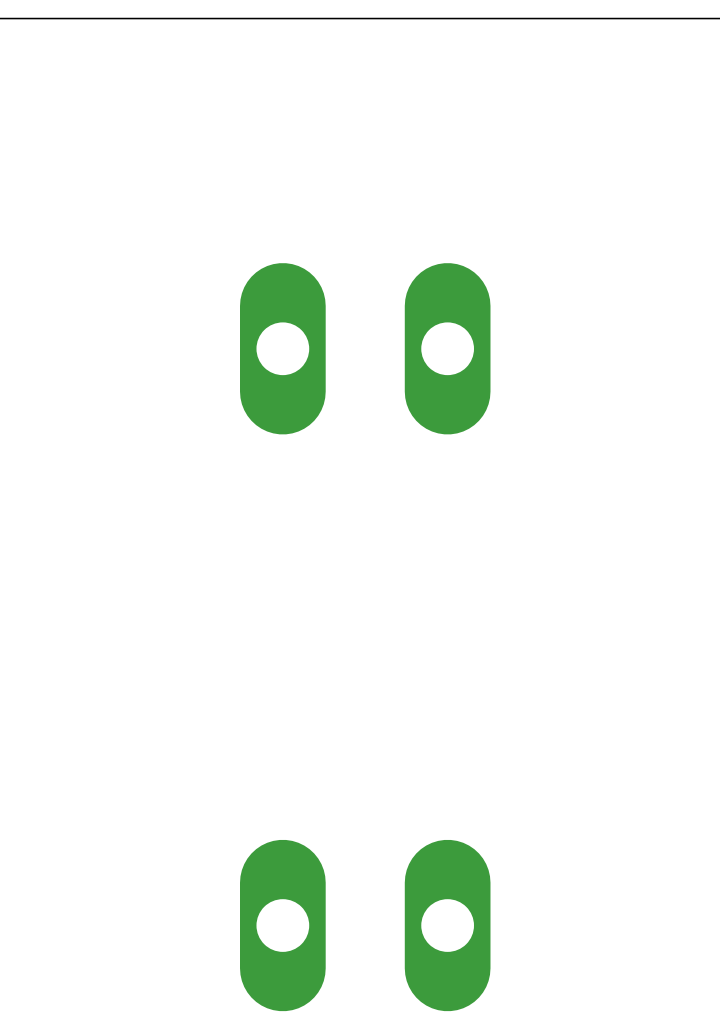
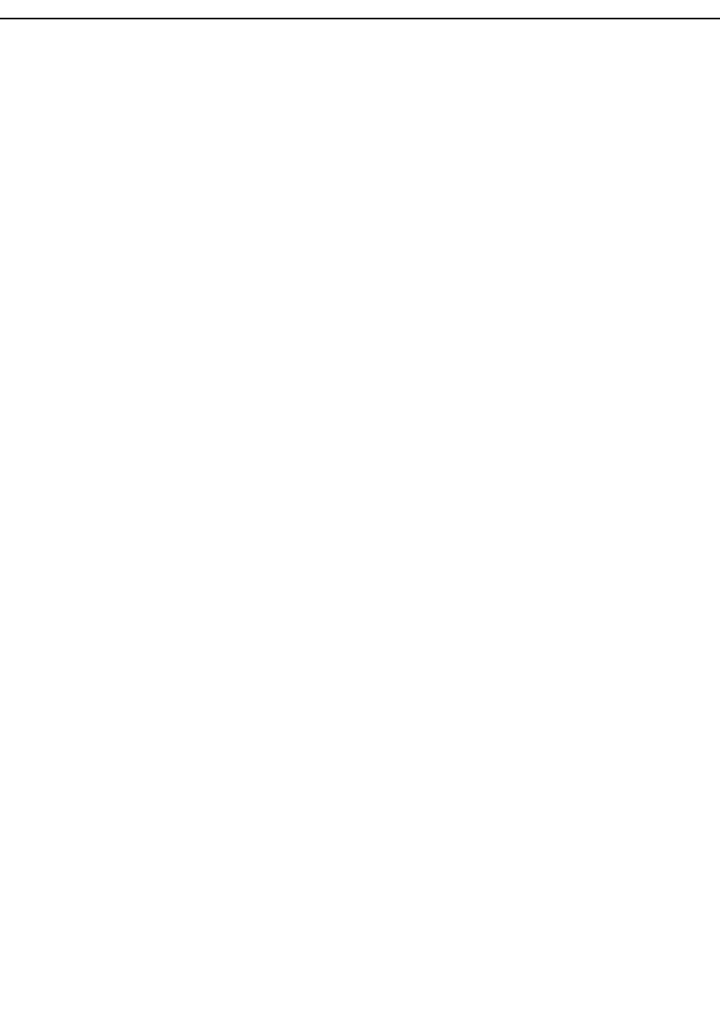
part: (365, 348) -> none
part: (365, 925) -> none

